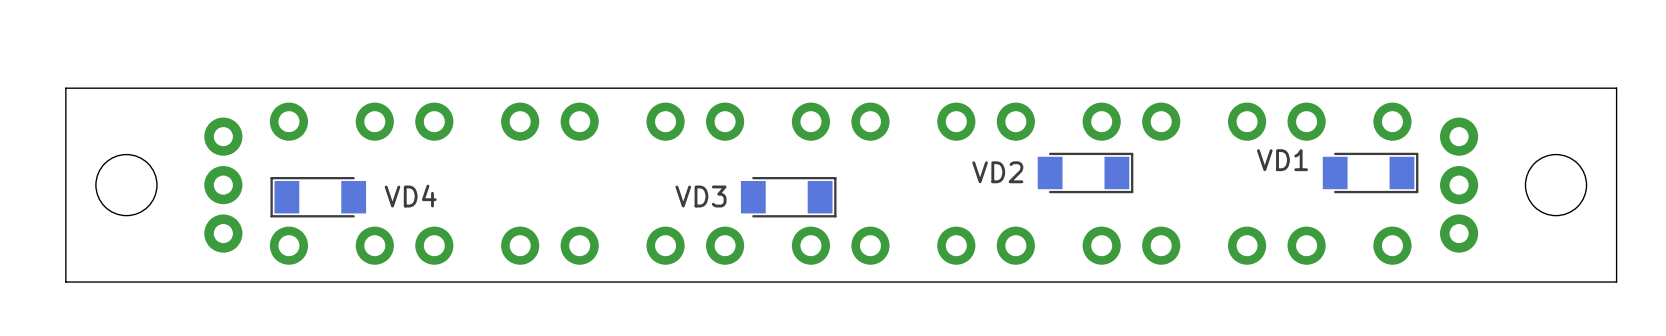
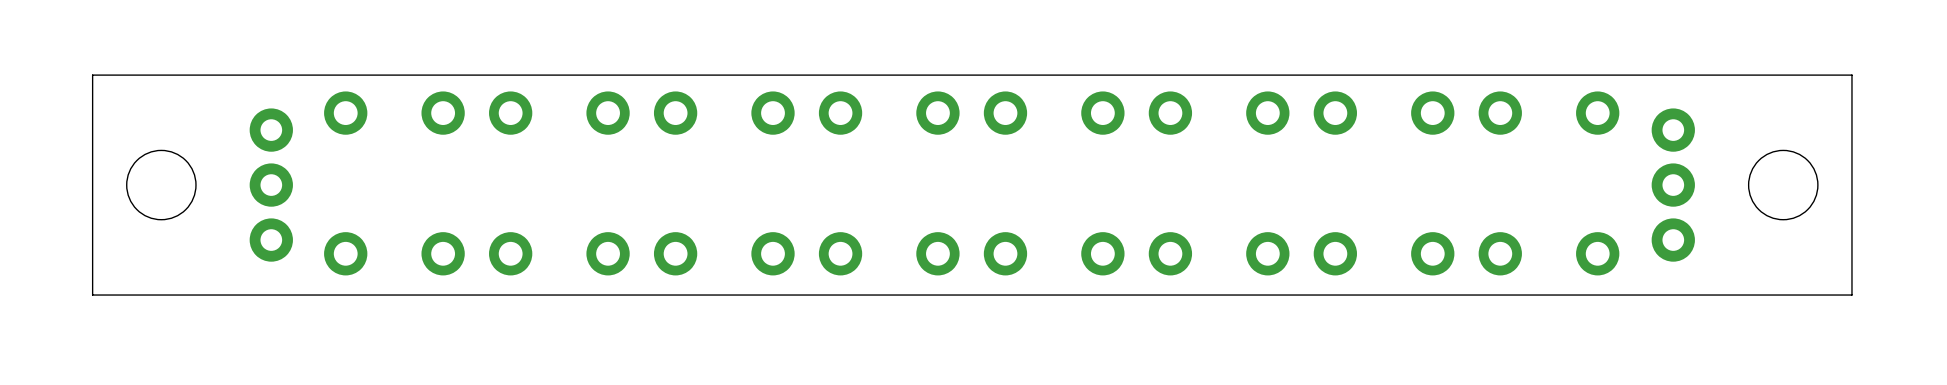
VD2: (1085, 172) -> none
VD1: (1370, 172) -> none
VD4: (318, 197) -> none
VD3: (788, 197) -> none

